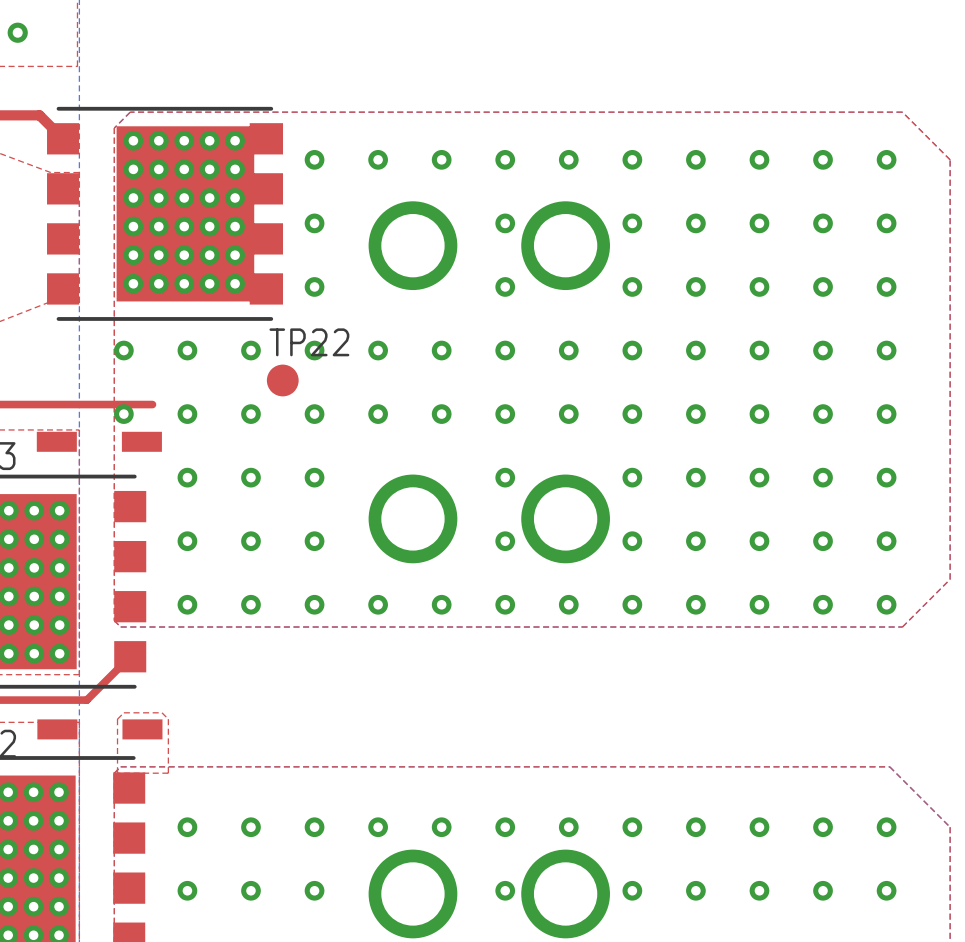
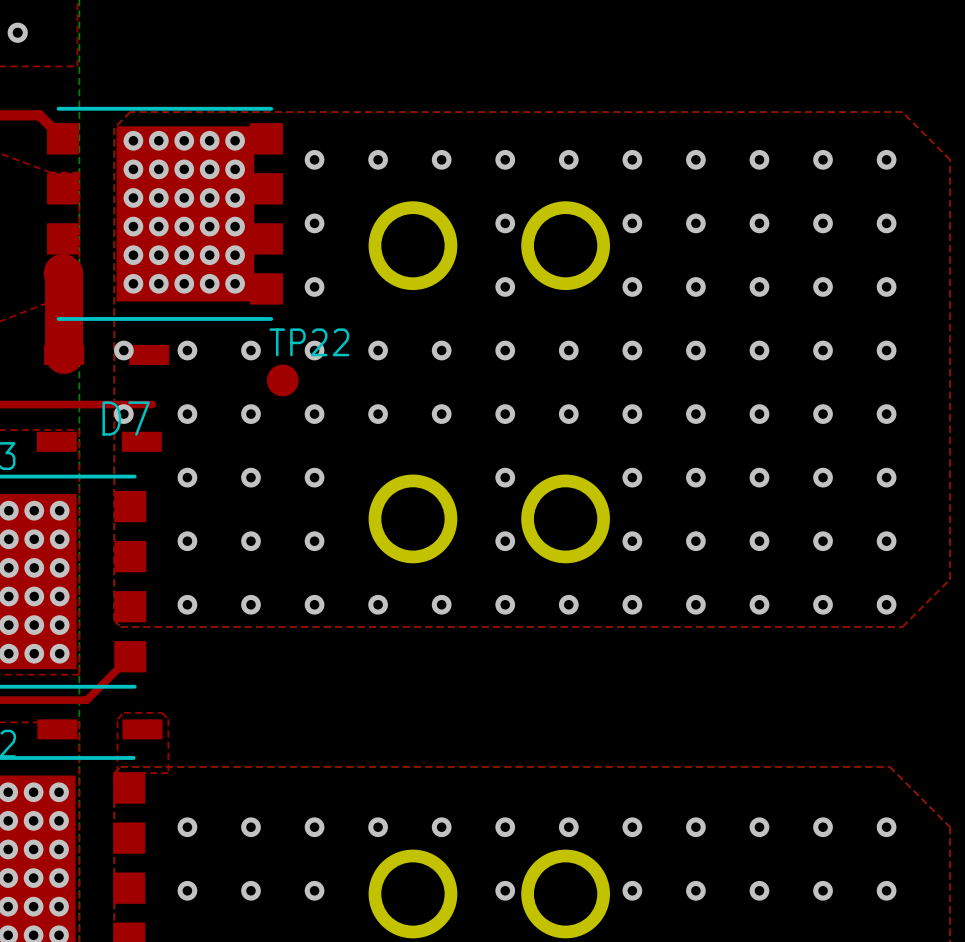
top track: none -> (62, 272) (64, 354)
D7: none -> (106, 354)

